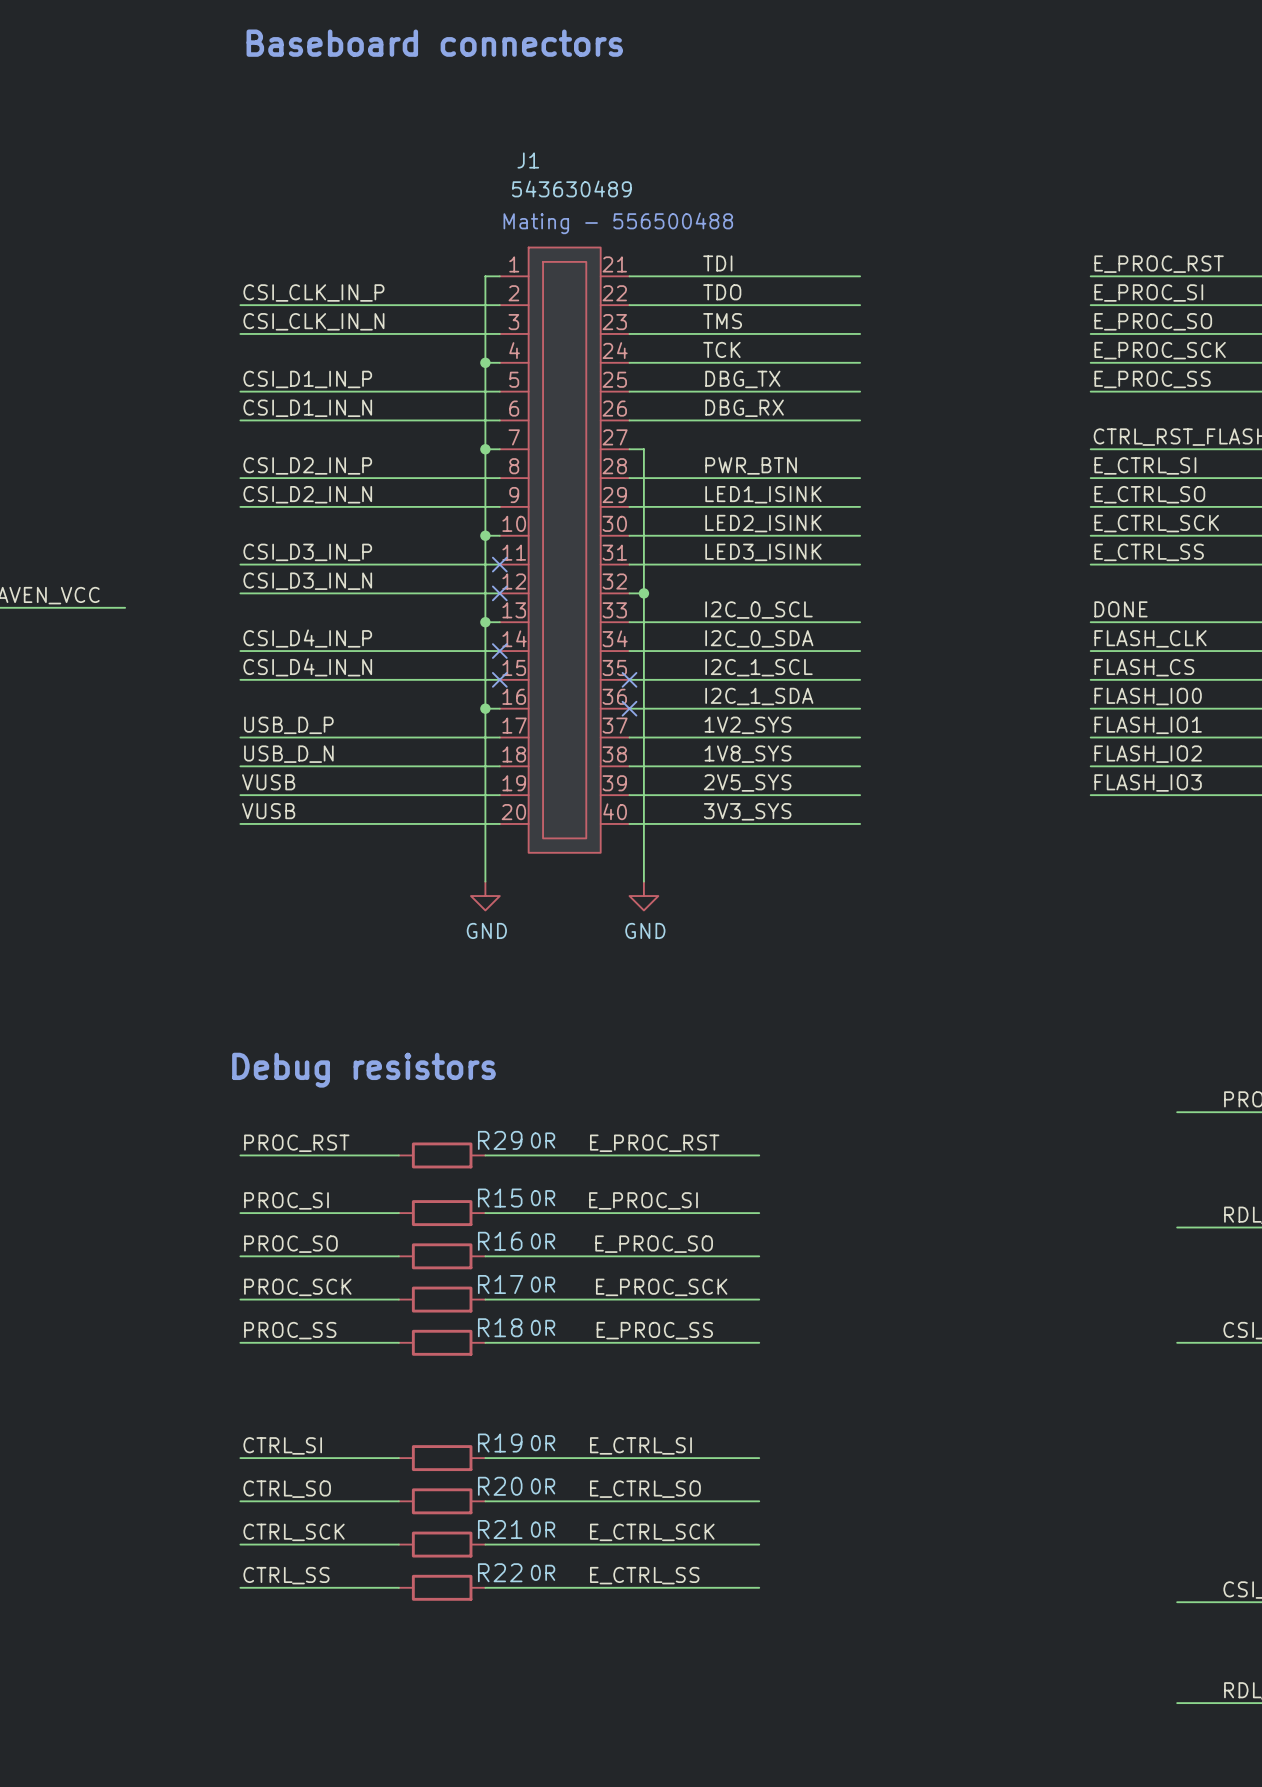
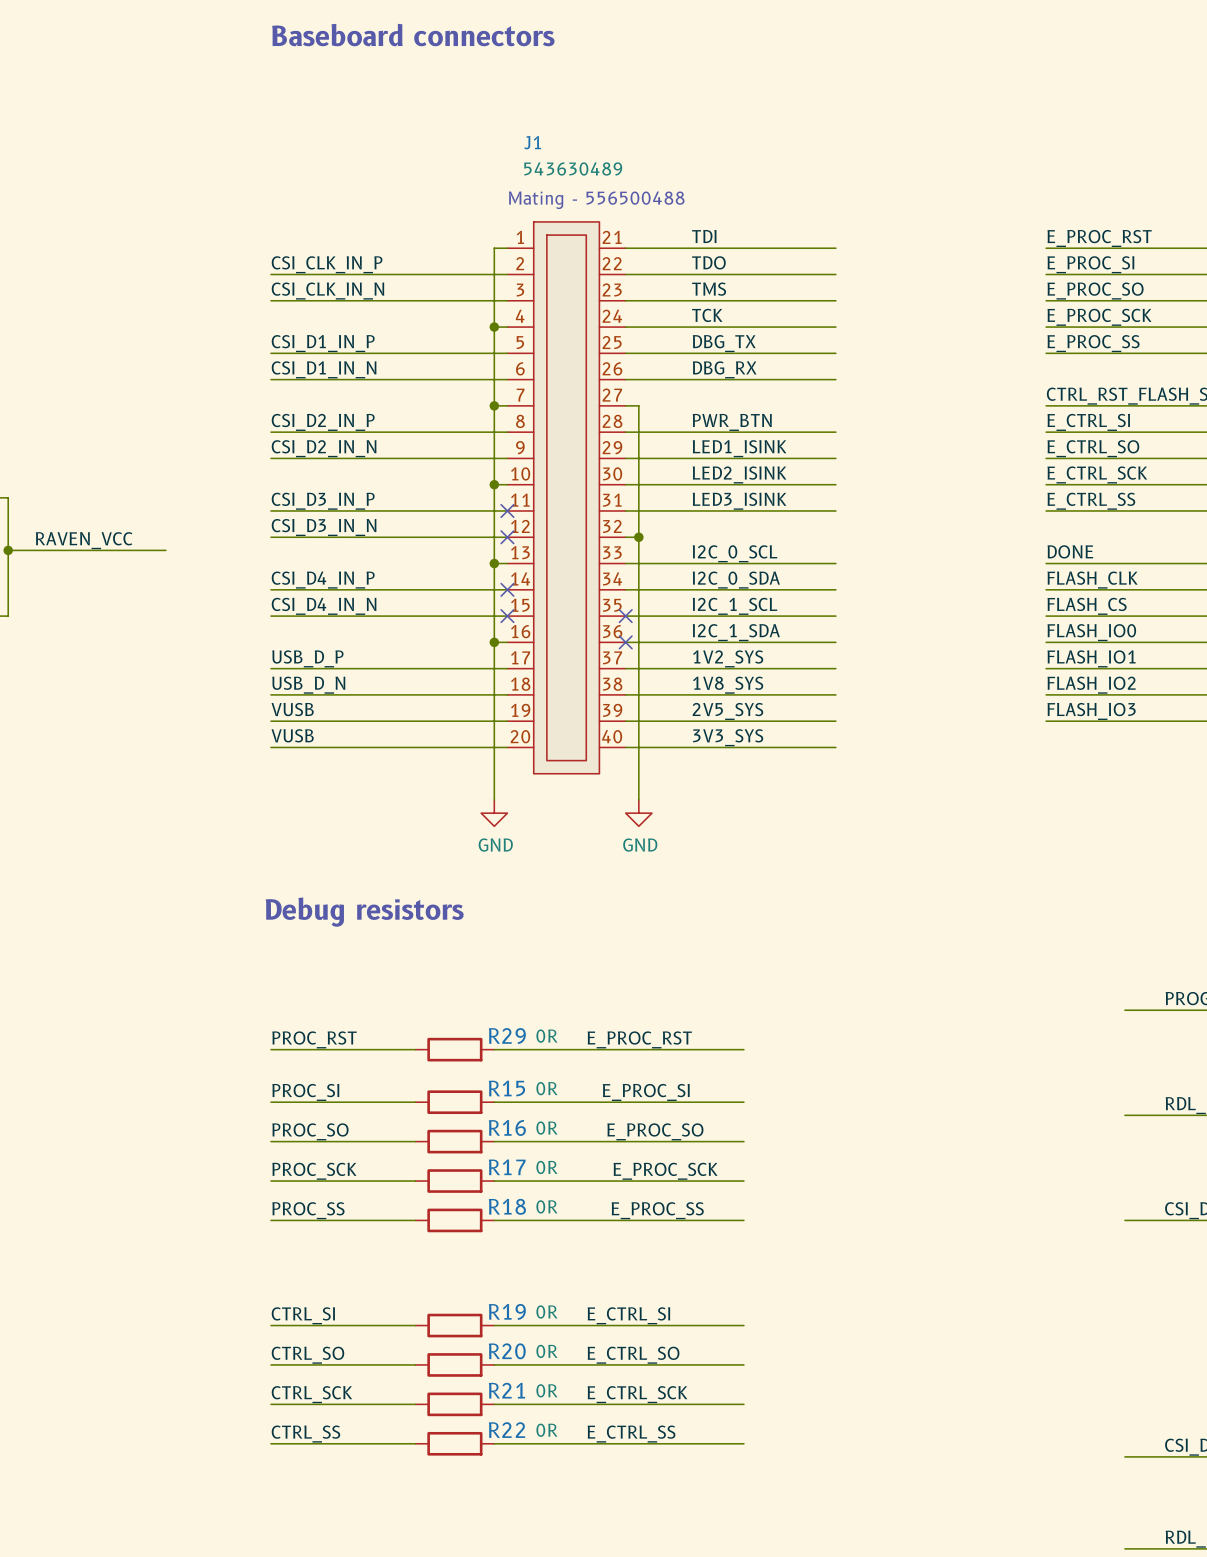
text position: Debug resistors (363, 1070) -> Debug resistors (364, 912)

